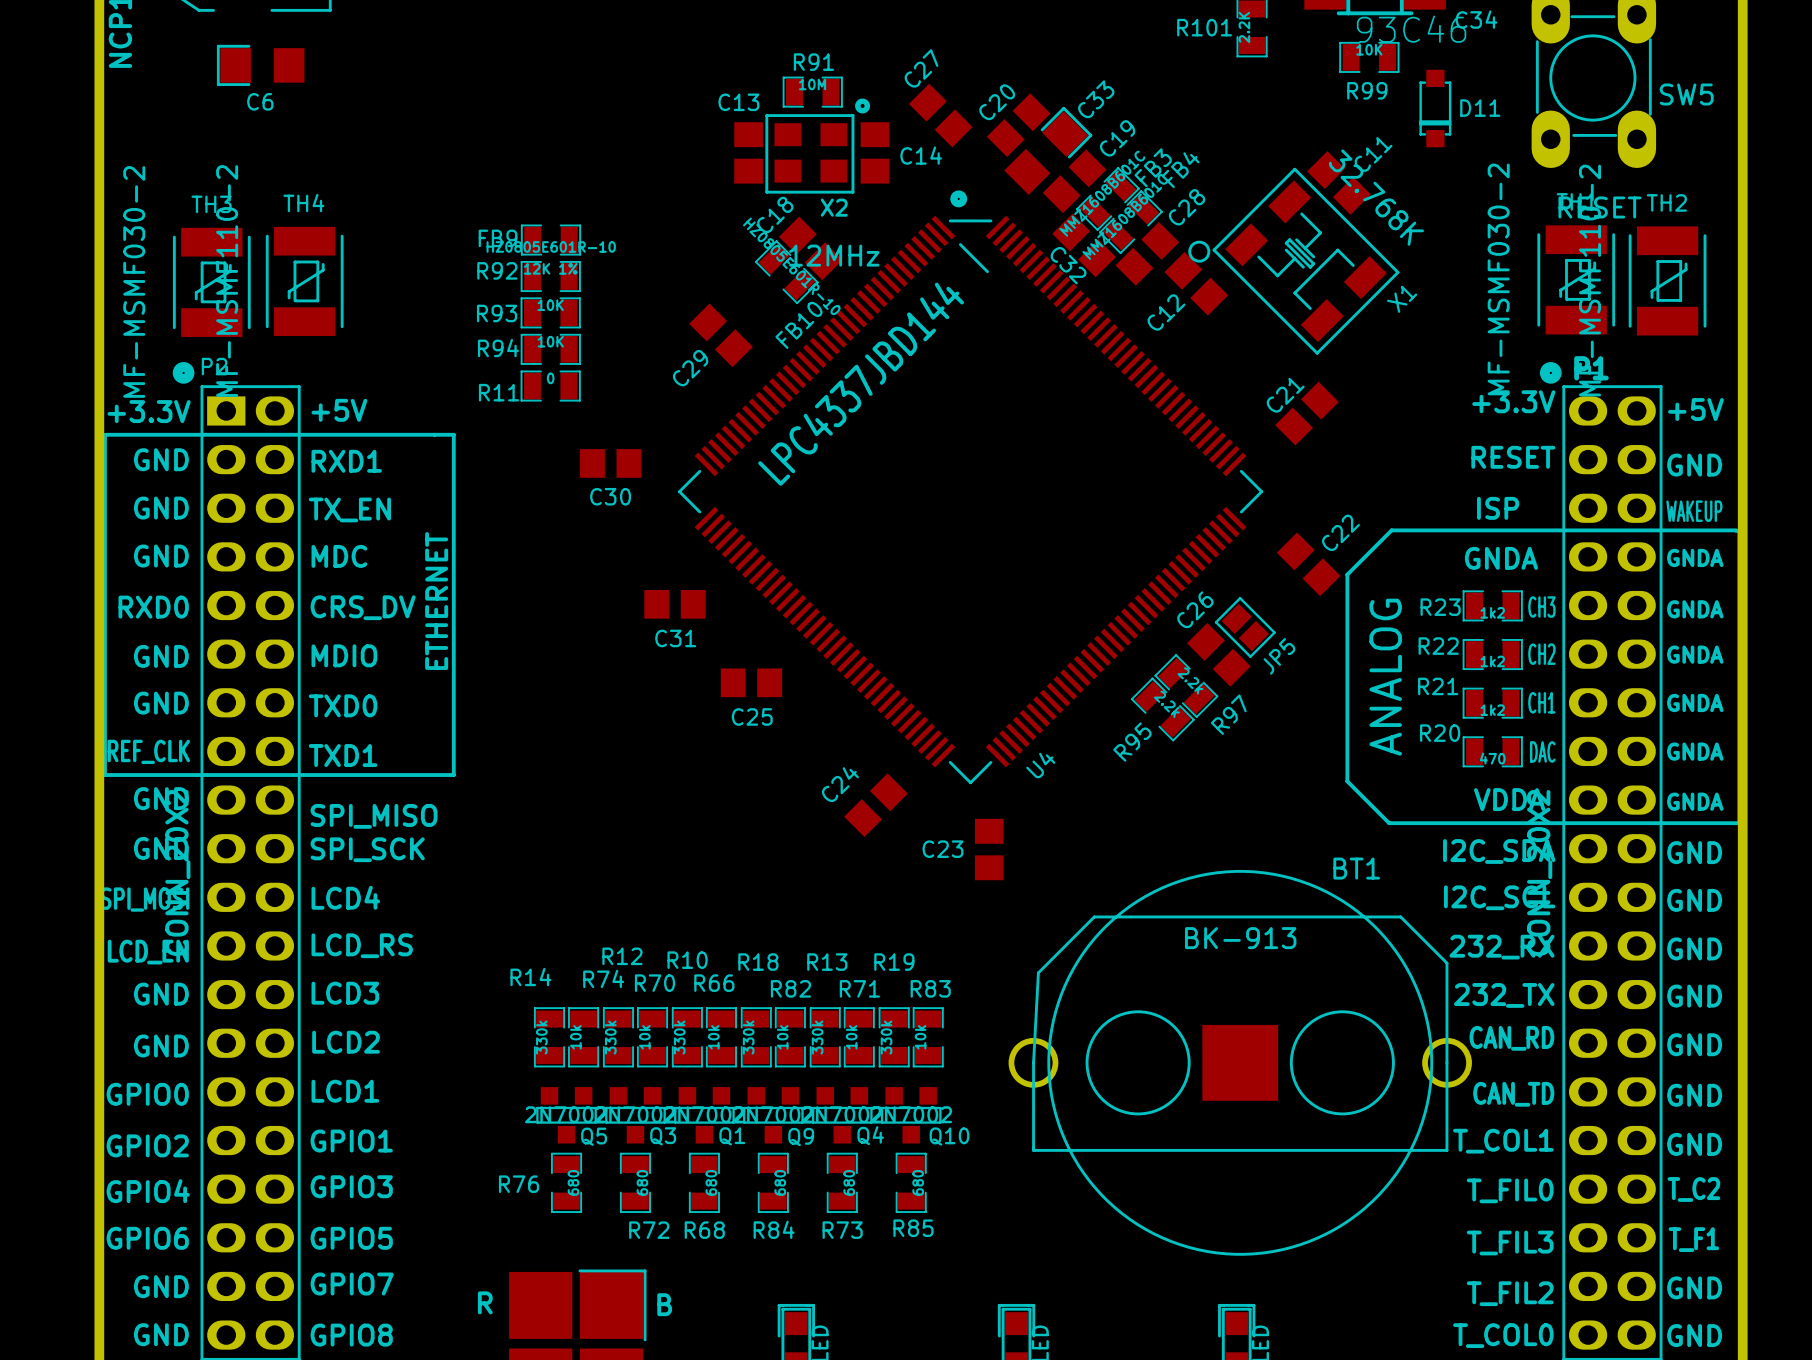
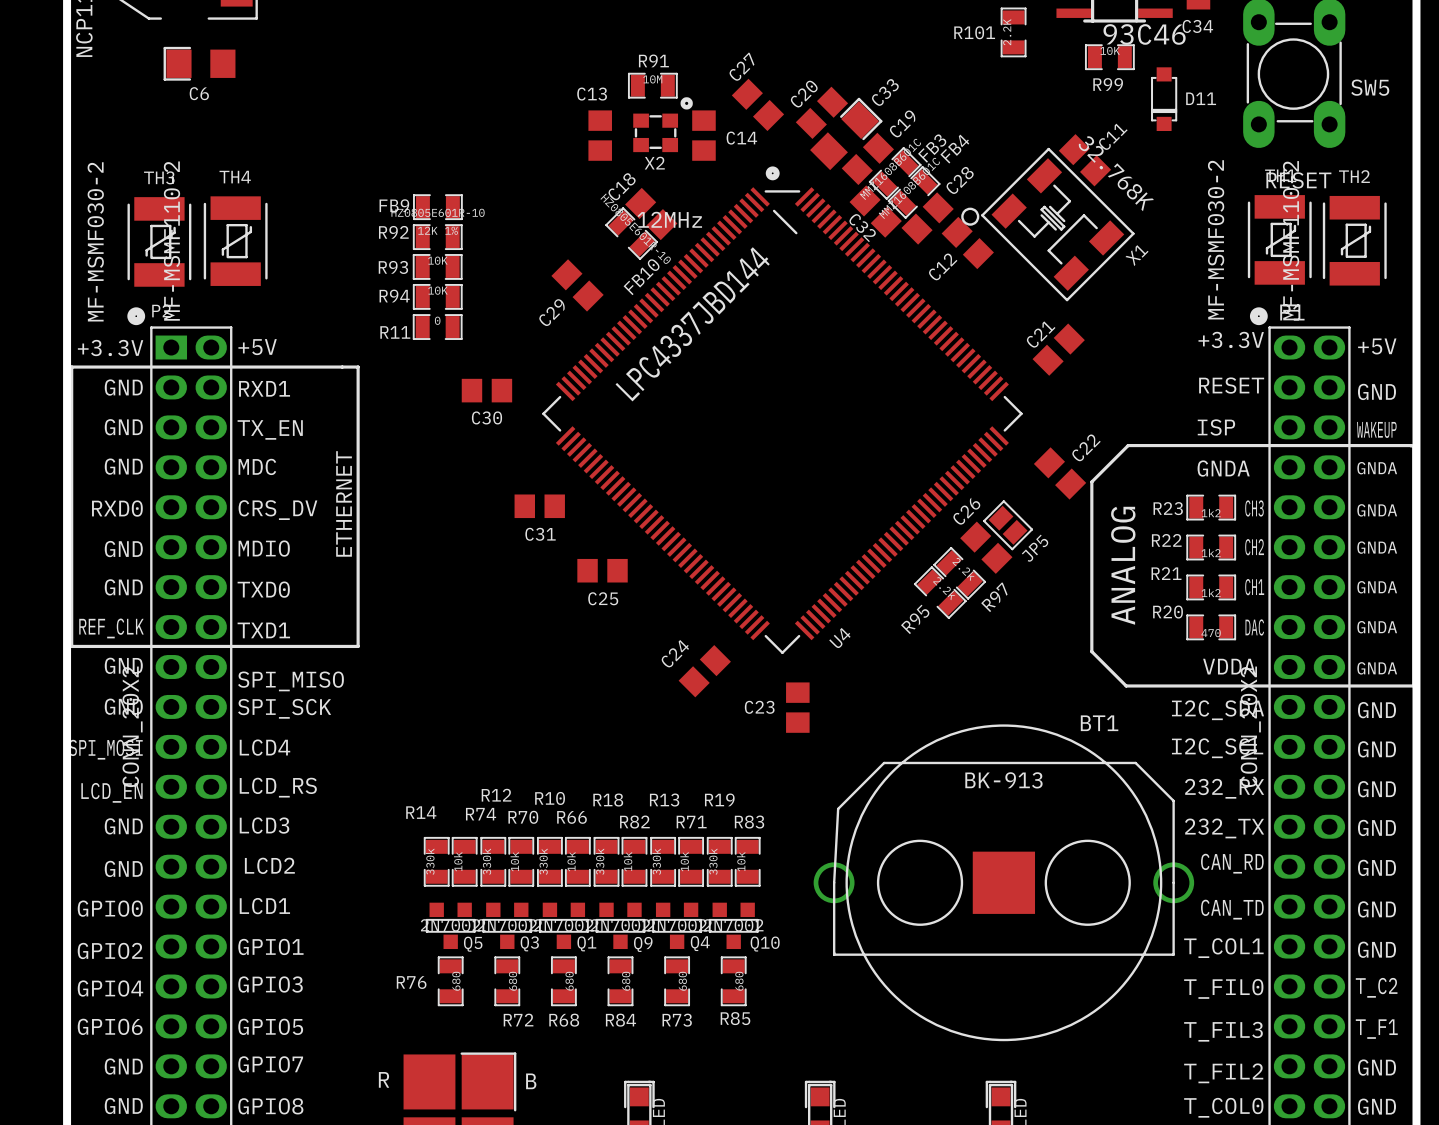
X2 footprint: [765, 98, 871, 194] -> [633, 97, 693, 153]

